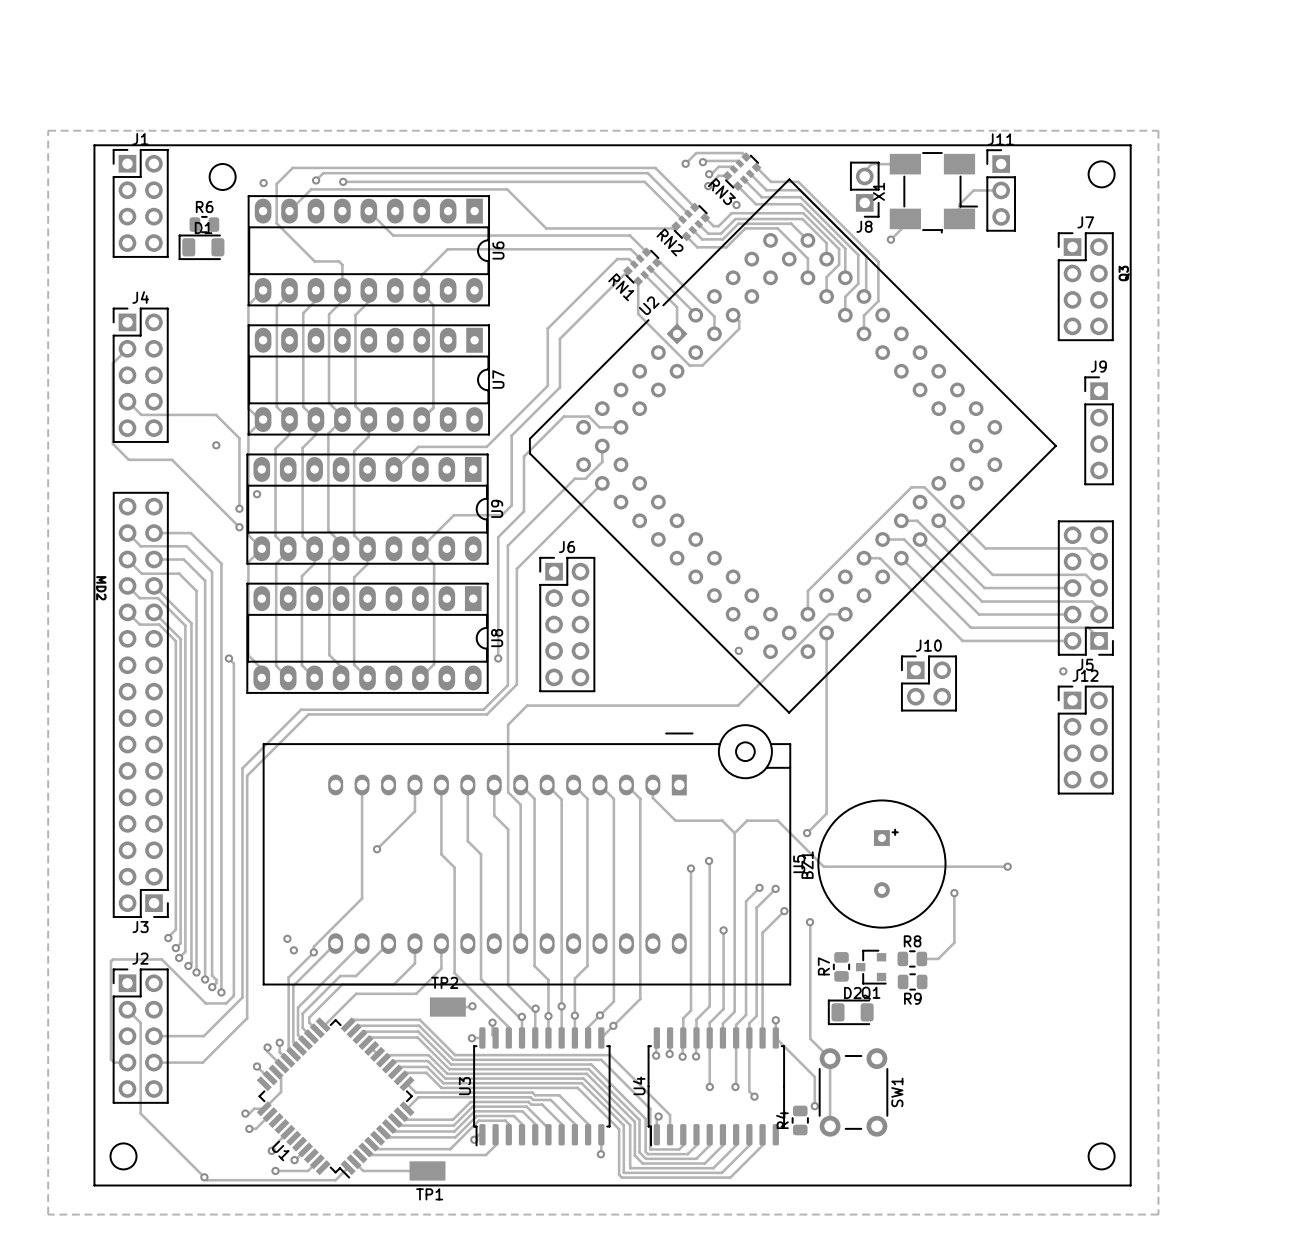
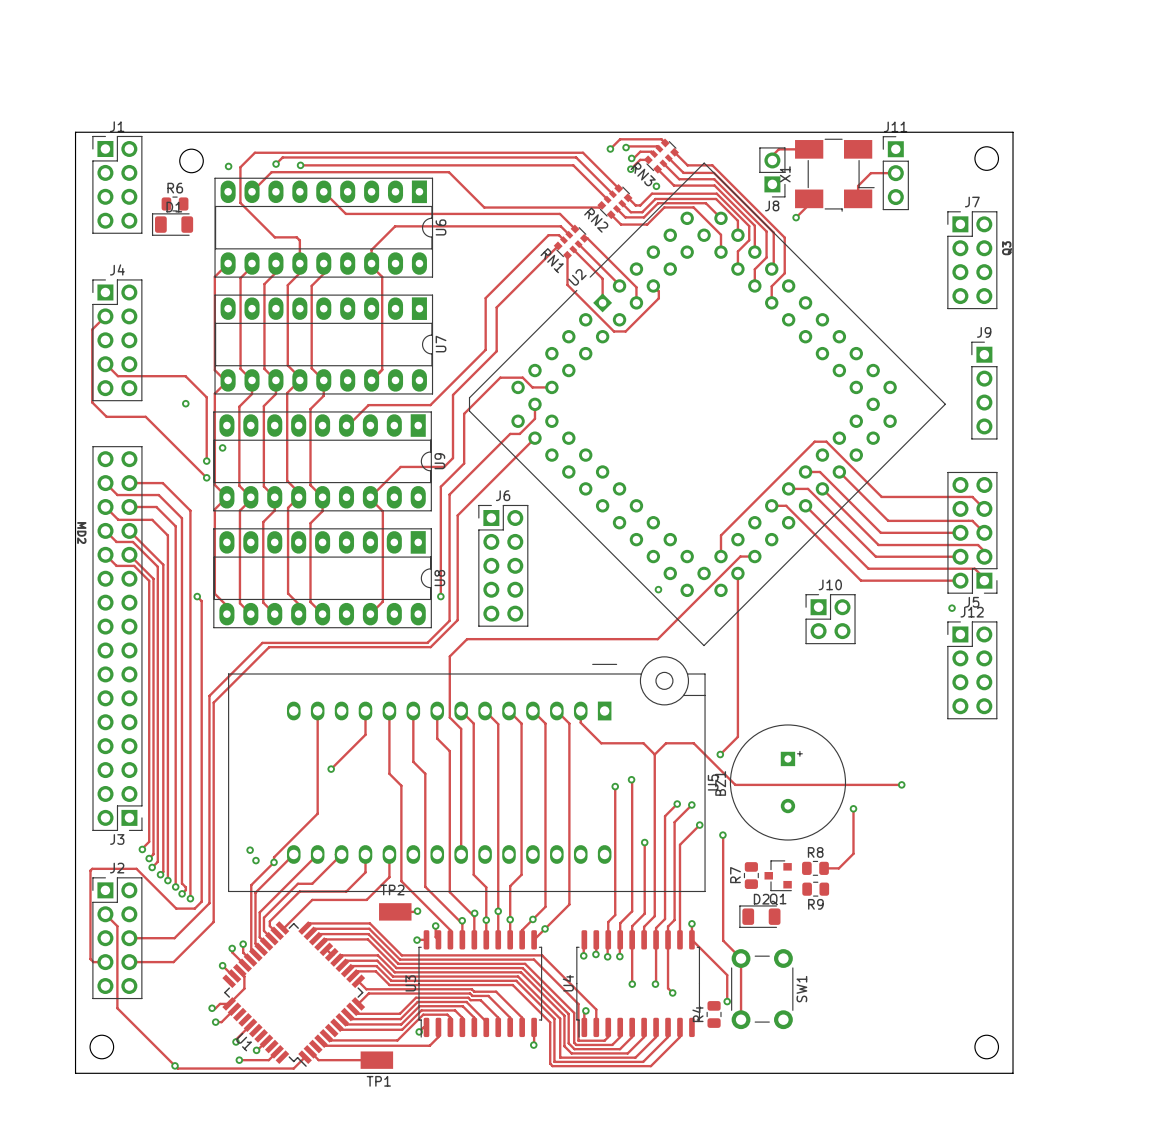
zone outline: (48, 130) (48, 1214) (1158, 1214) (1158, 130) (48, 130) -> none

